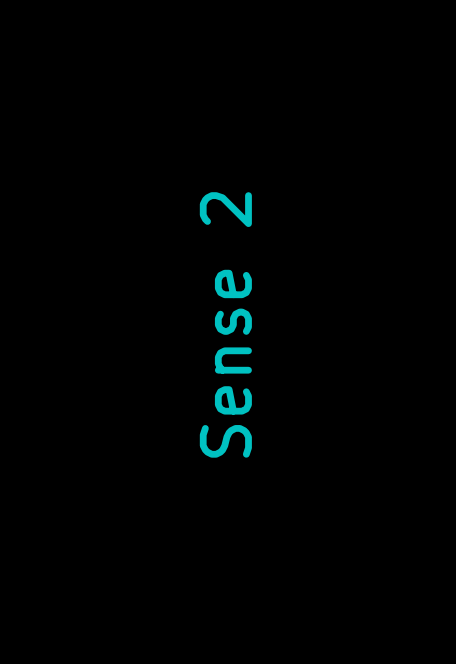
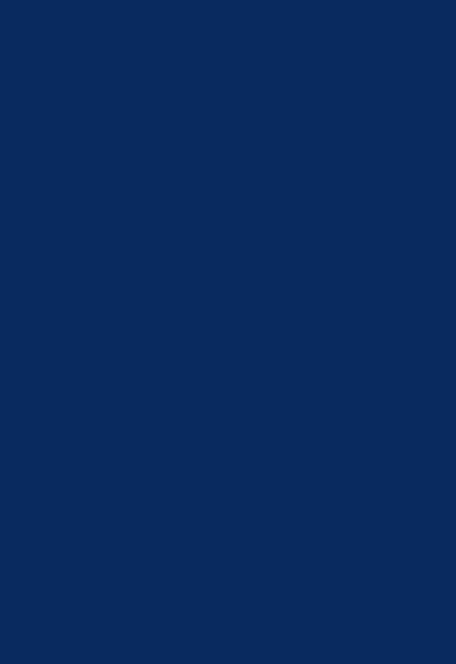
text: Sense 2 (225, 324) -> none

